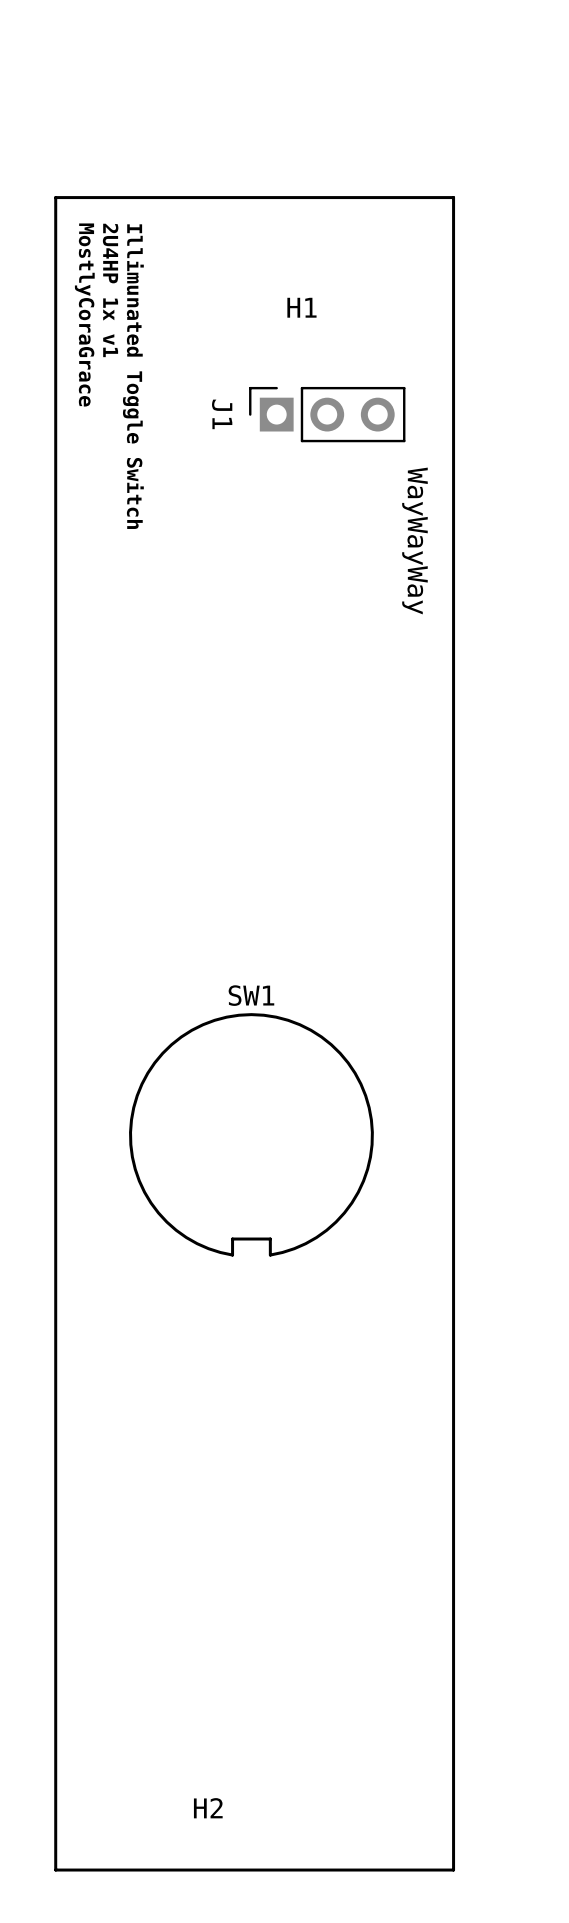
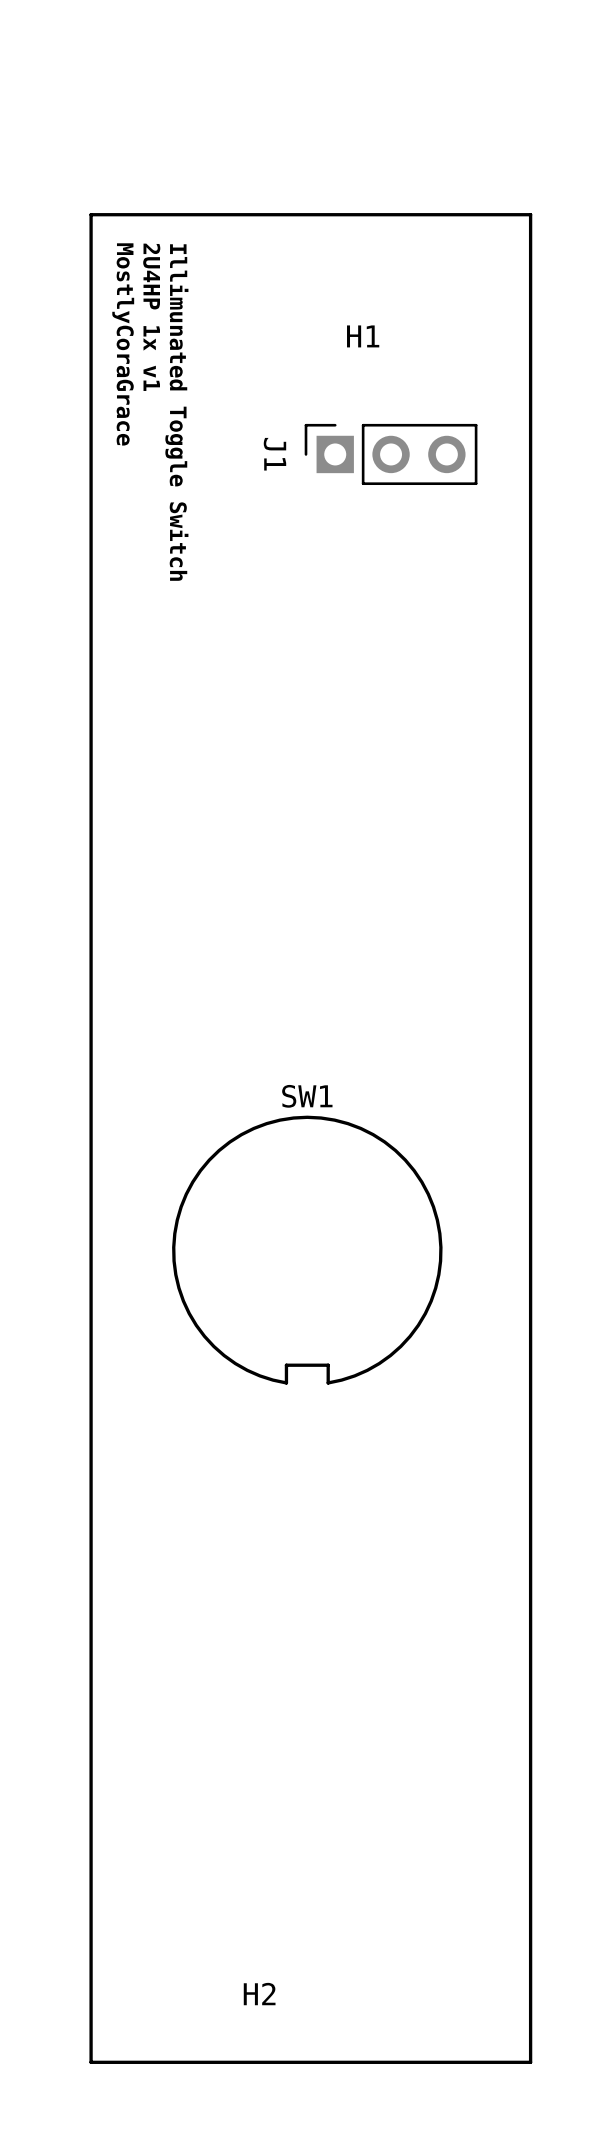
text: WayWayWay (414, 540) -> none

